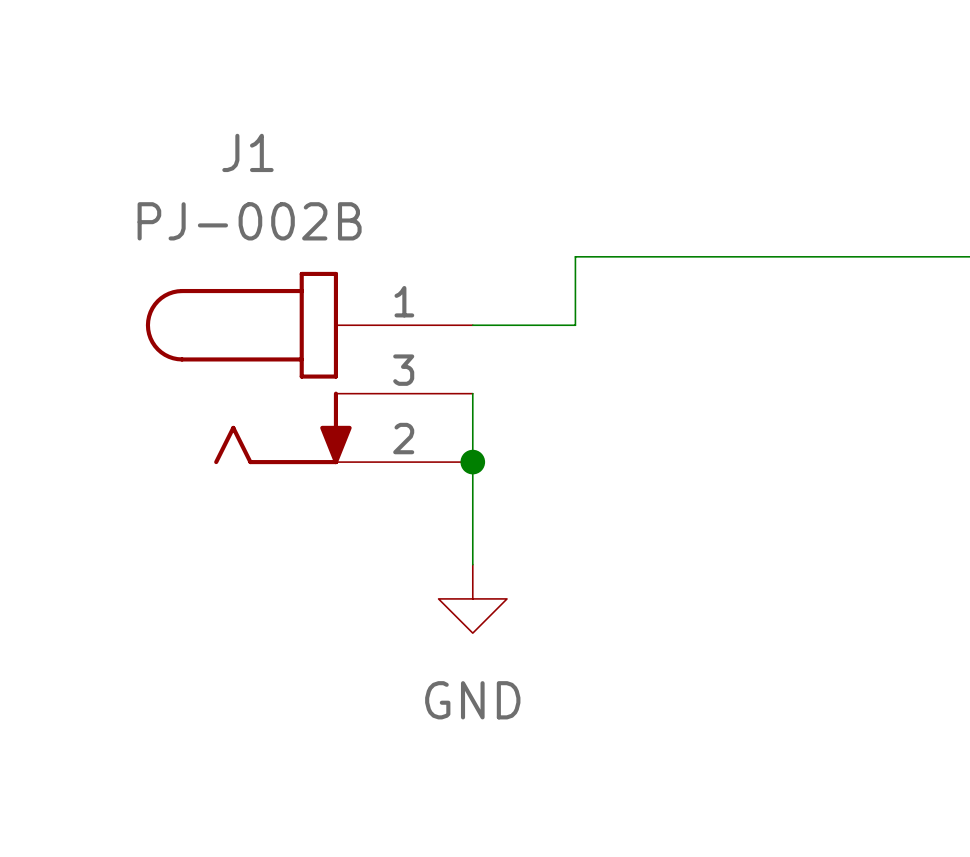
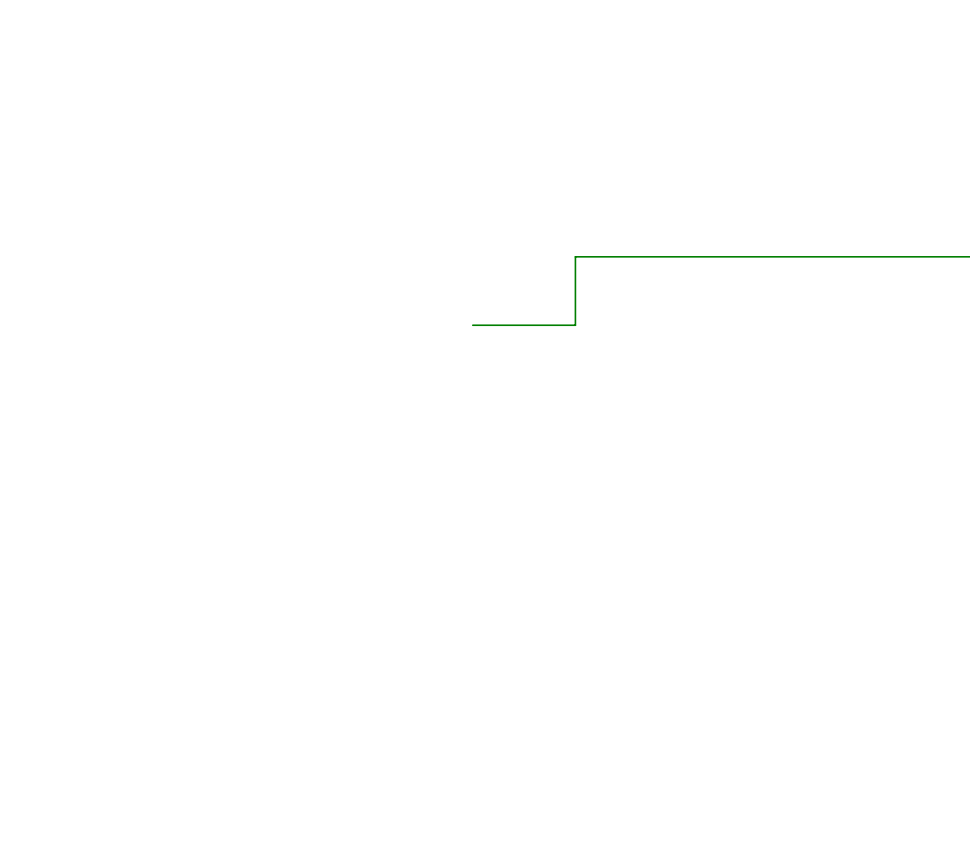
J1: PJ-002B (309, 368) -> none
wire: (472, 393) (472, 564) -> none
junction: (472, 462) -> none
power symbol: GND (472, 598) -> none

